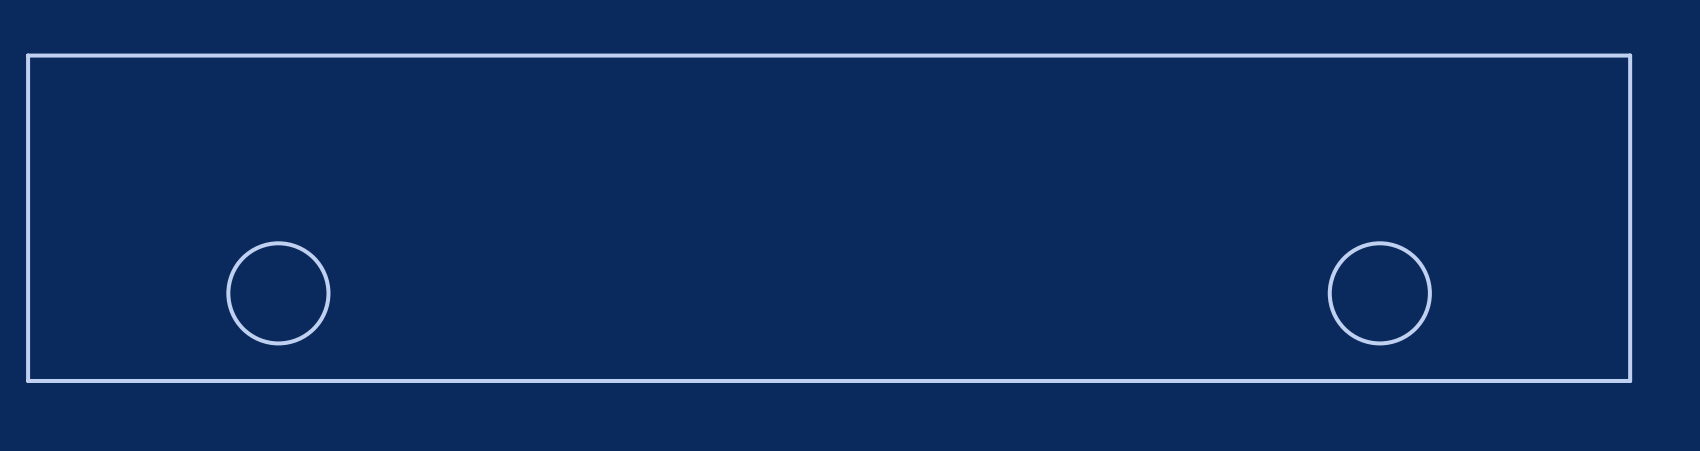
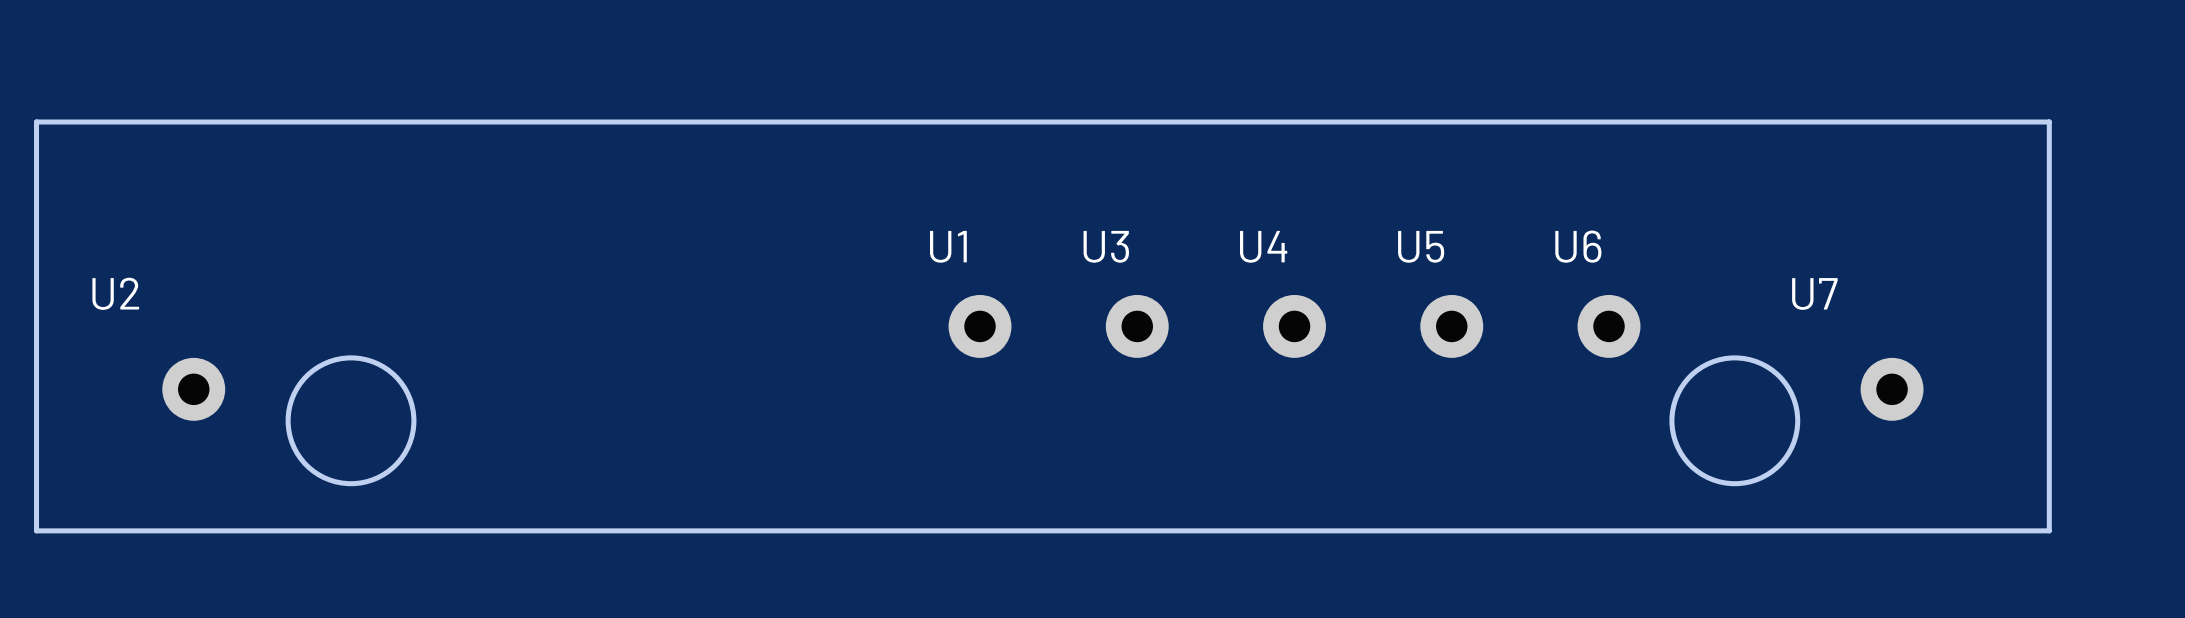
U1: none -> (980, 326)
U3: none -> (1137, 326)
U4: none -> (1294, 326)
U5: none -> (1451, 326)
U6: none -> (1609, 326)
U2: none -> (193, 389)
U7: none -> (1892, 389)

